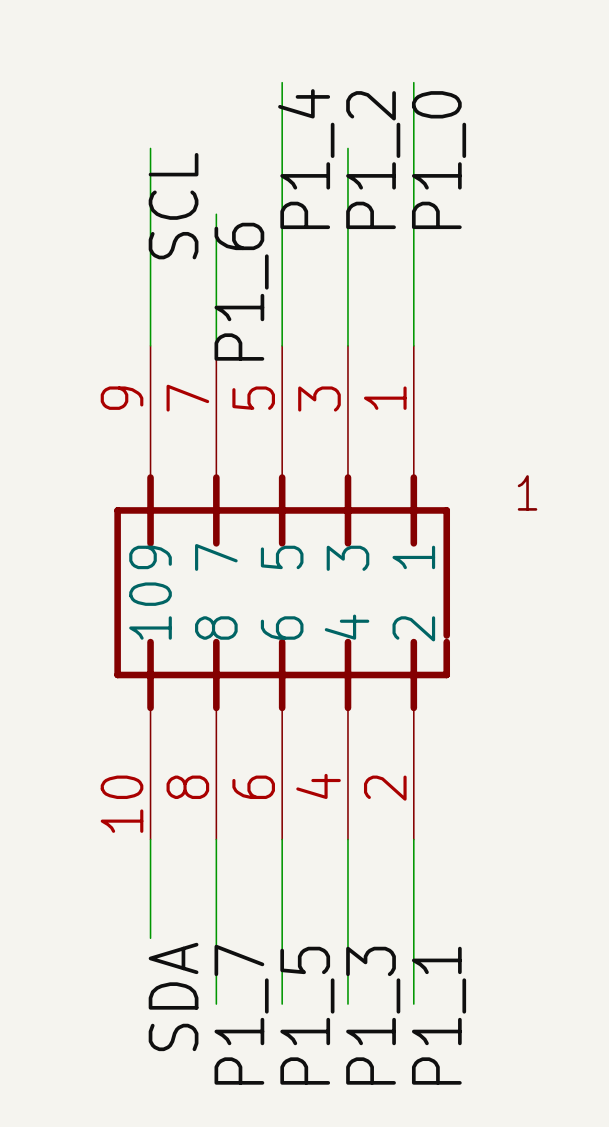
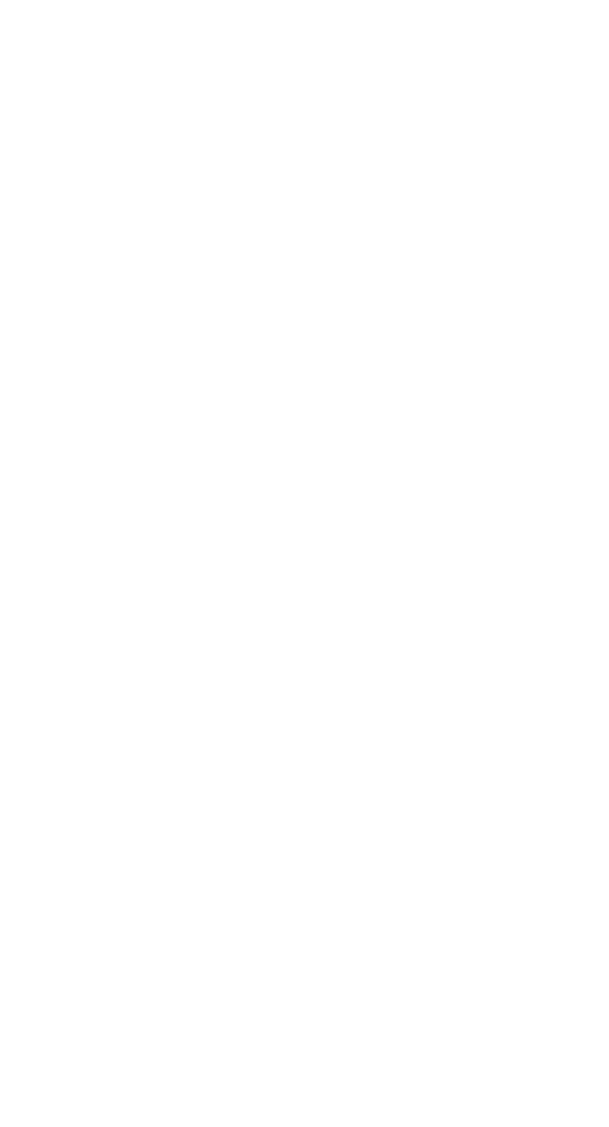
wire: (282, 82) (282, 345) -> none
wire: (413, 82) (413, 345) -> none
wire: (150, 148) (150, 345) -> none
wire: (347, 148) (347, 345) -> none
label: P1_4 (306, 159) -> none
label: P1_2 (373, 160) -> none
label: P1_0 (439, 160) -> none
label: SCL (173, 206) -> none
wire: (216, 214) (216, 345) -> none
label: P1_6 (241, 291) -> none
part: (282, 592) -> none
wire: (150, 839) (150, 938) -> none
wire: (216, 839) (216, 1004) -> none
wire: (282, 839) (282, 1004) -> none
wire: (347, 839) (347, 1004) -> none
wire: (413, 839) (413, 1004) -> none
label: SDA (173, 996) -> none
label: P1_7 (241, 1014) -> none
label: P1_5 (307, 1015) -> none
label: P1_3 (373, 1015) -> none
label: P1_1 (439, 1015) -> none

